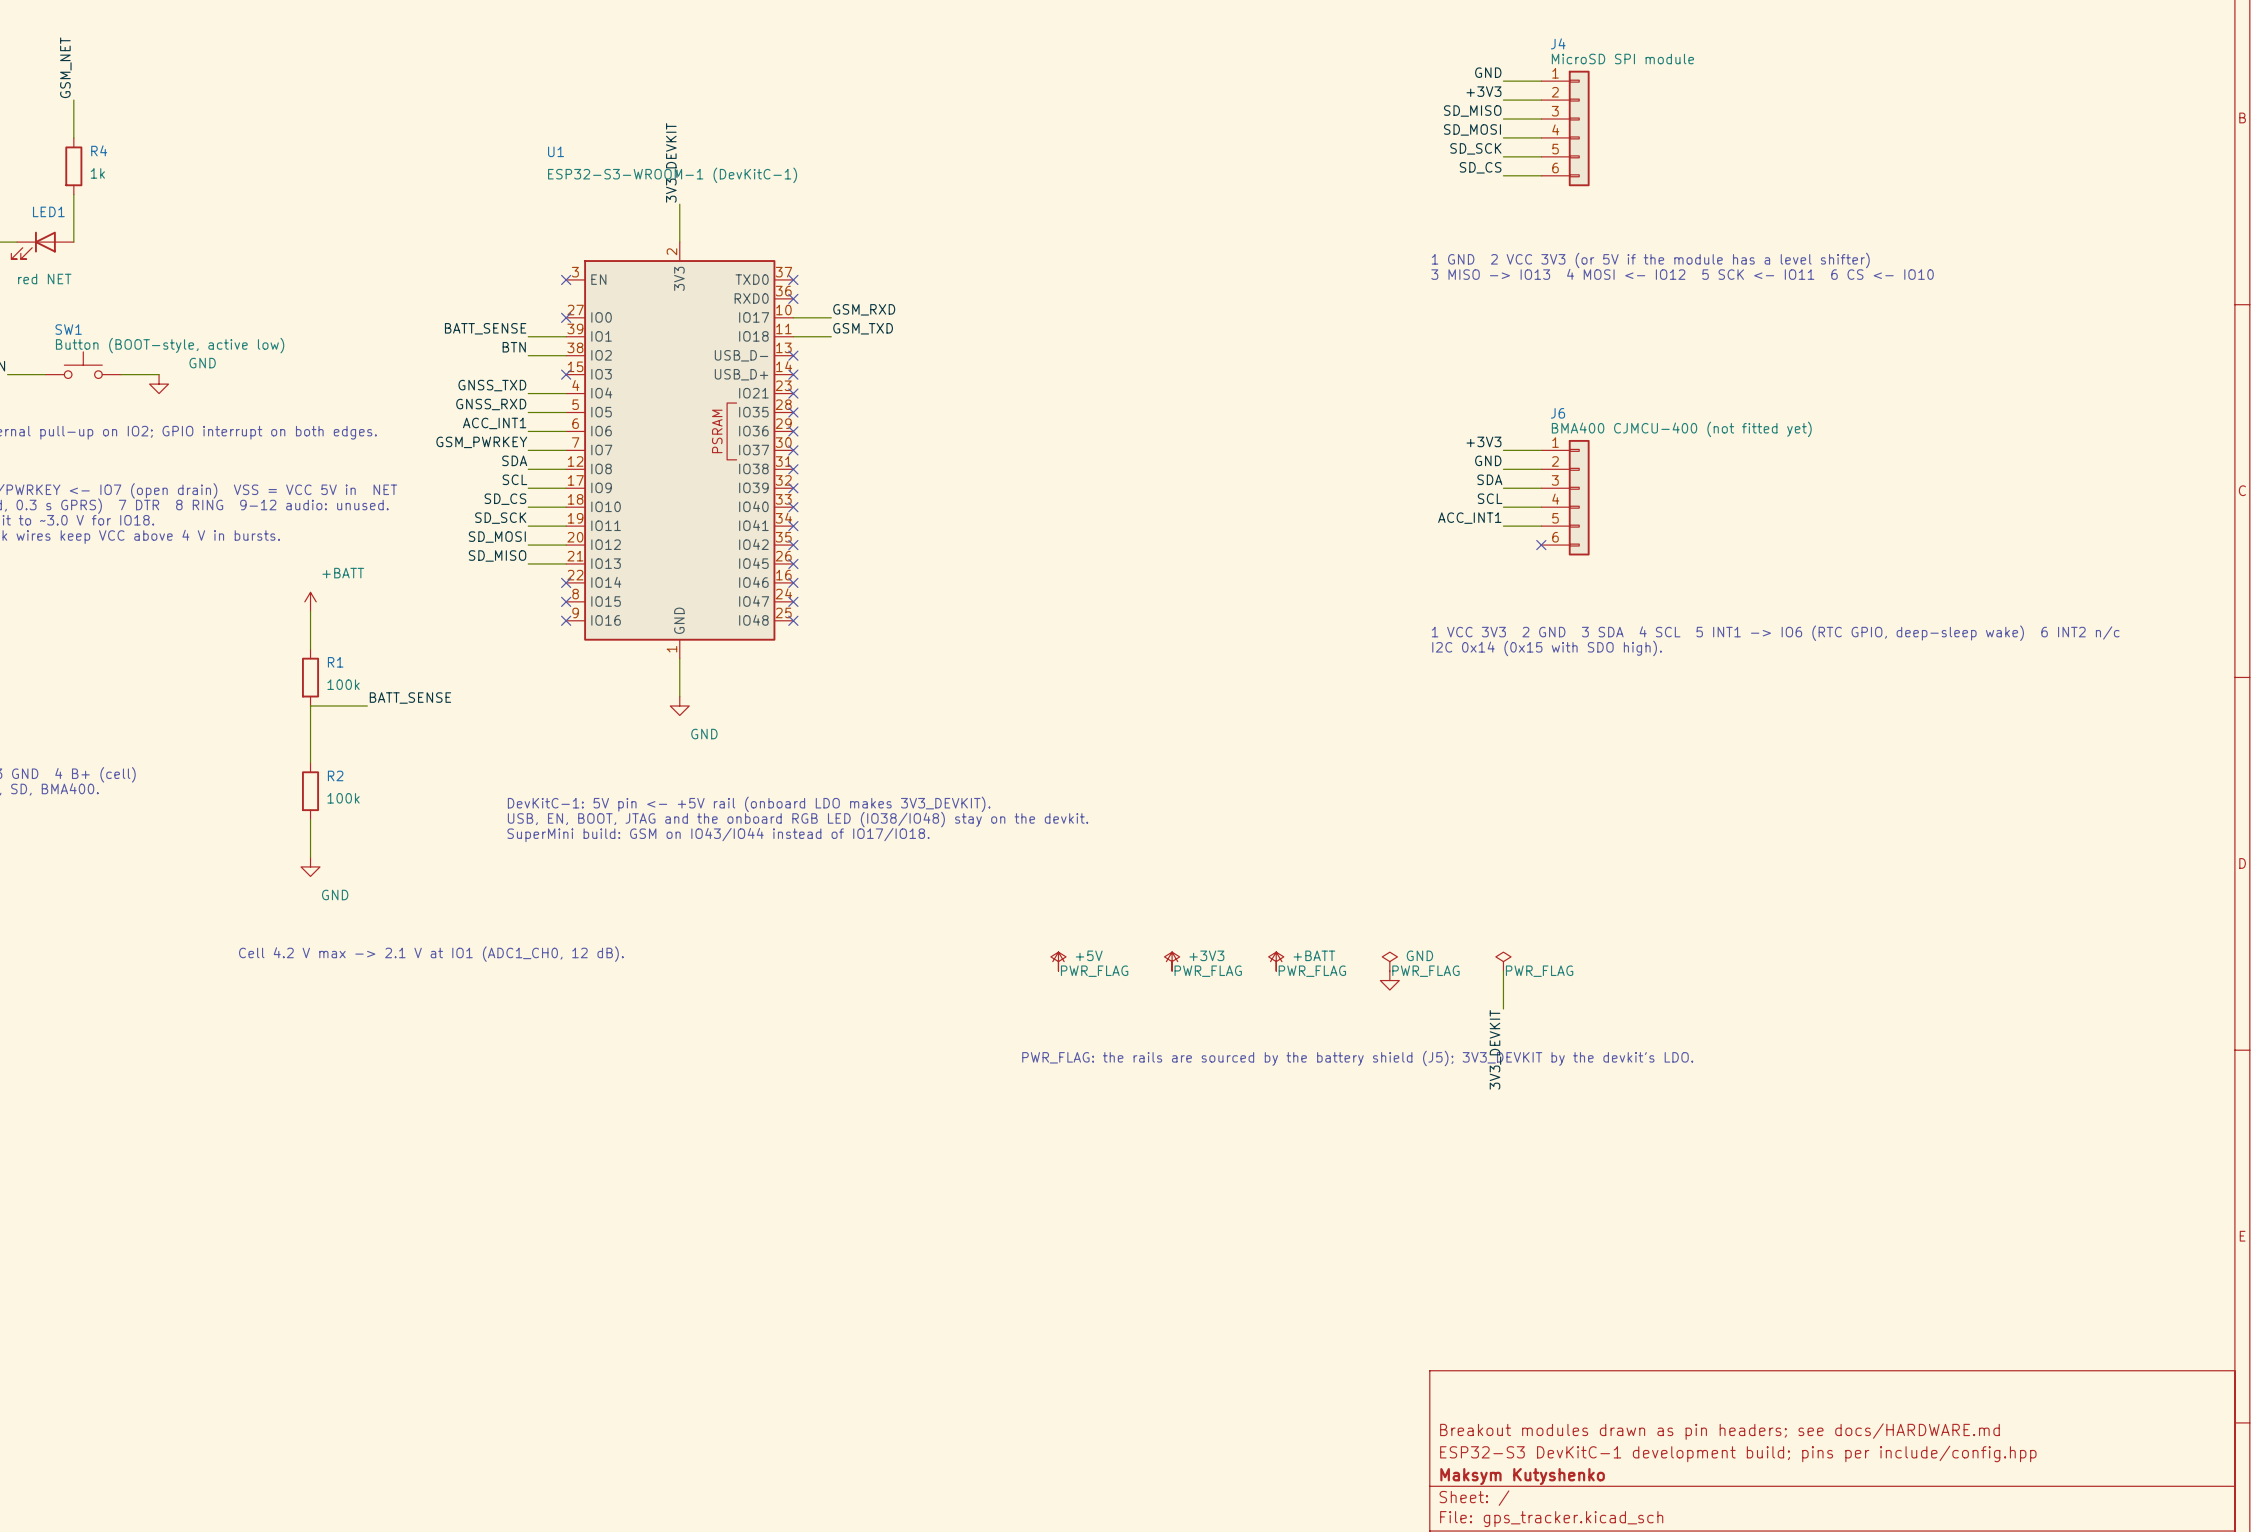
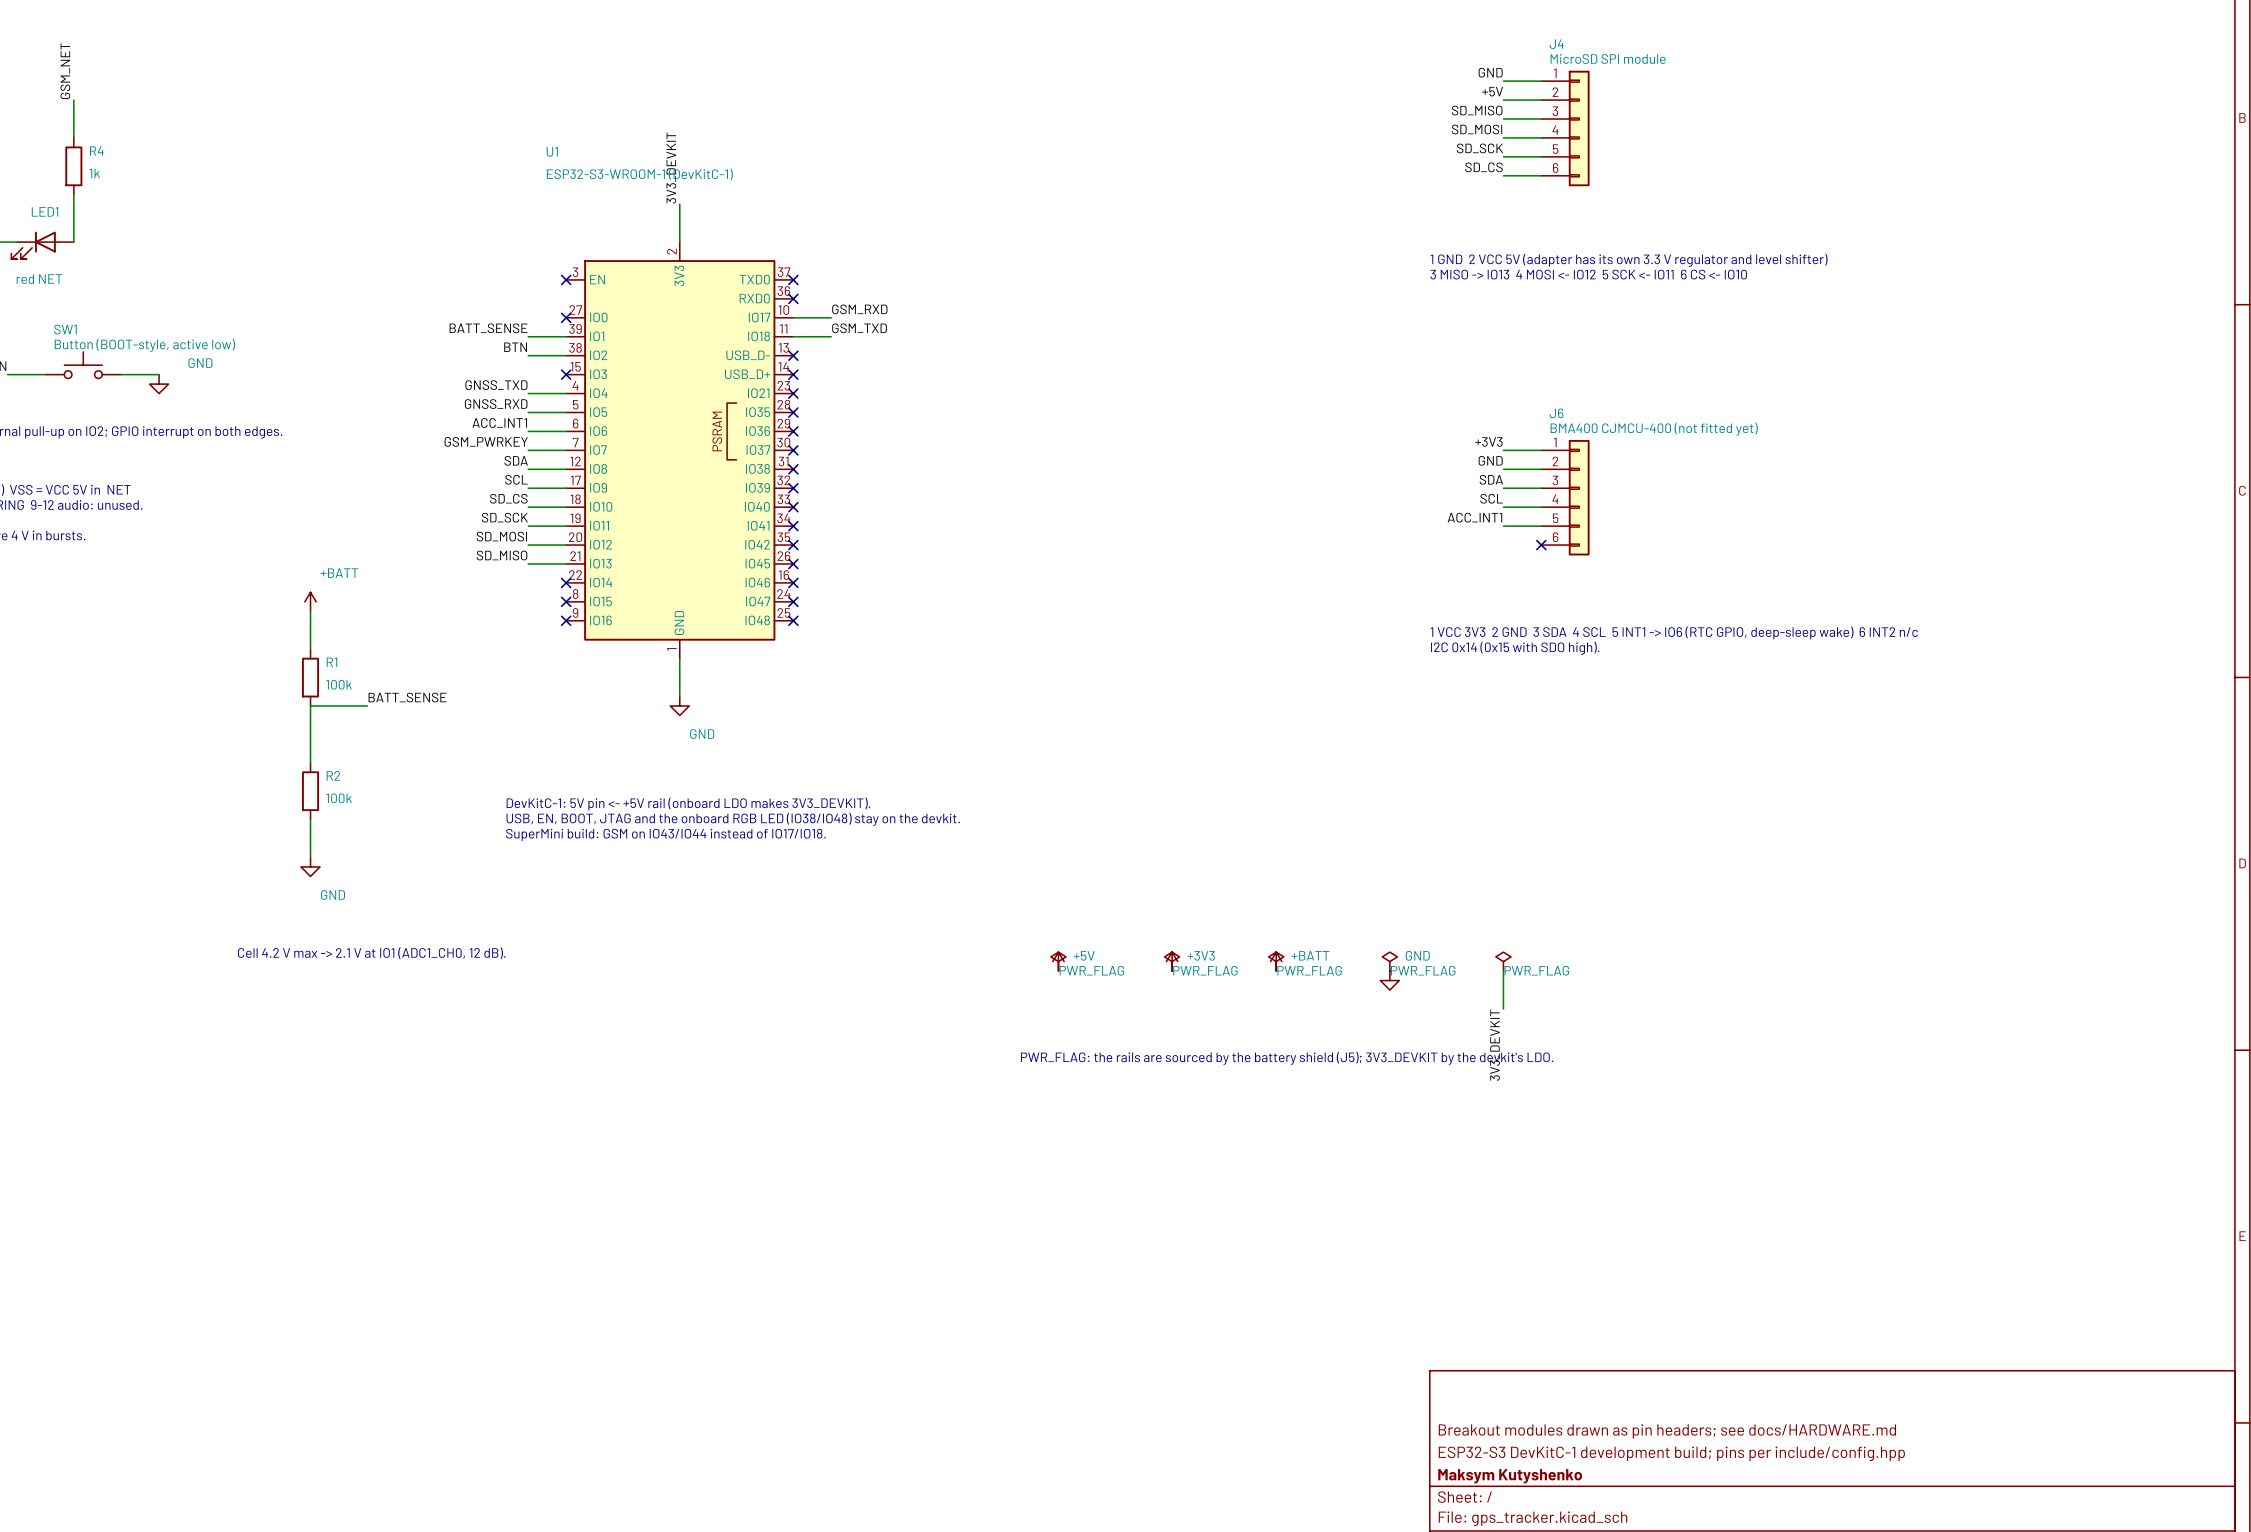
label: +3V3 (1483, 91) -> +5V (1492, 91)
text: 1 GND 2 VCC 3V3 (or 5V if the module has a level shifter) (1650, 260) -> 1 GND 2 VCC 5V (adapter has its own 3.3 V regulator and level shifter) (1629, 260)

